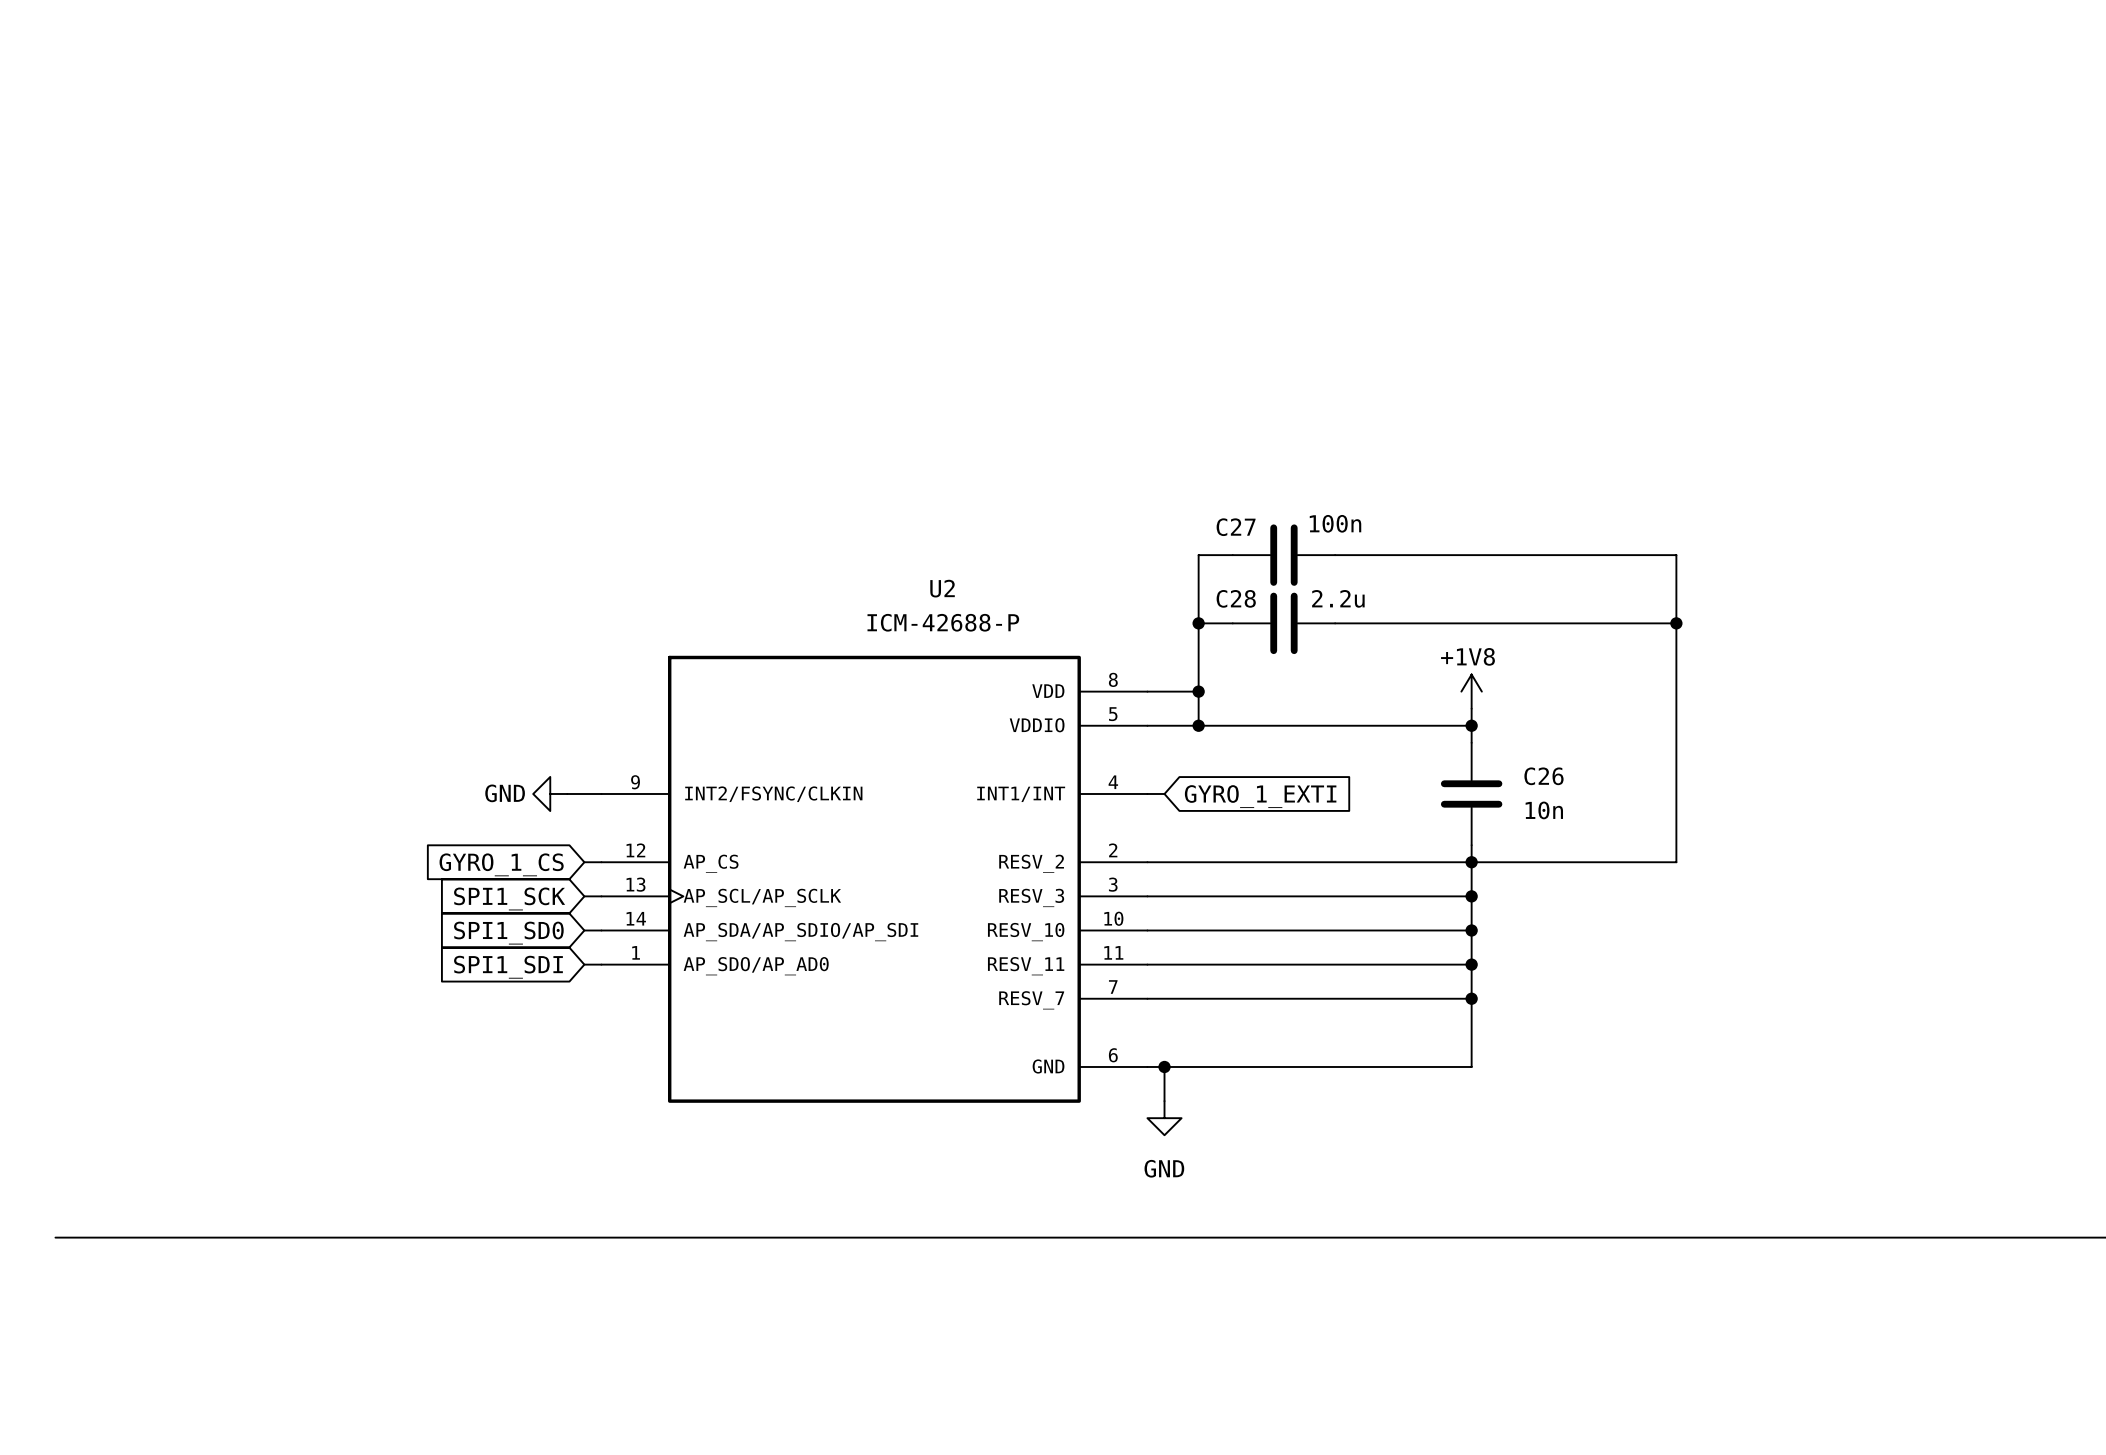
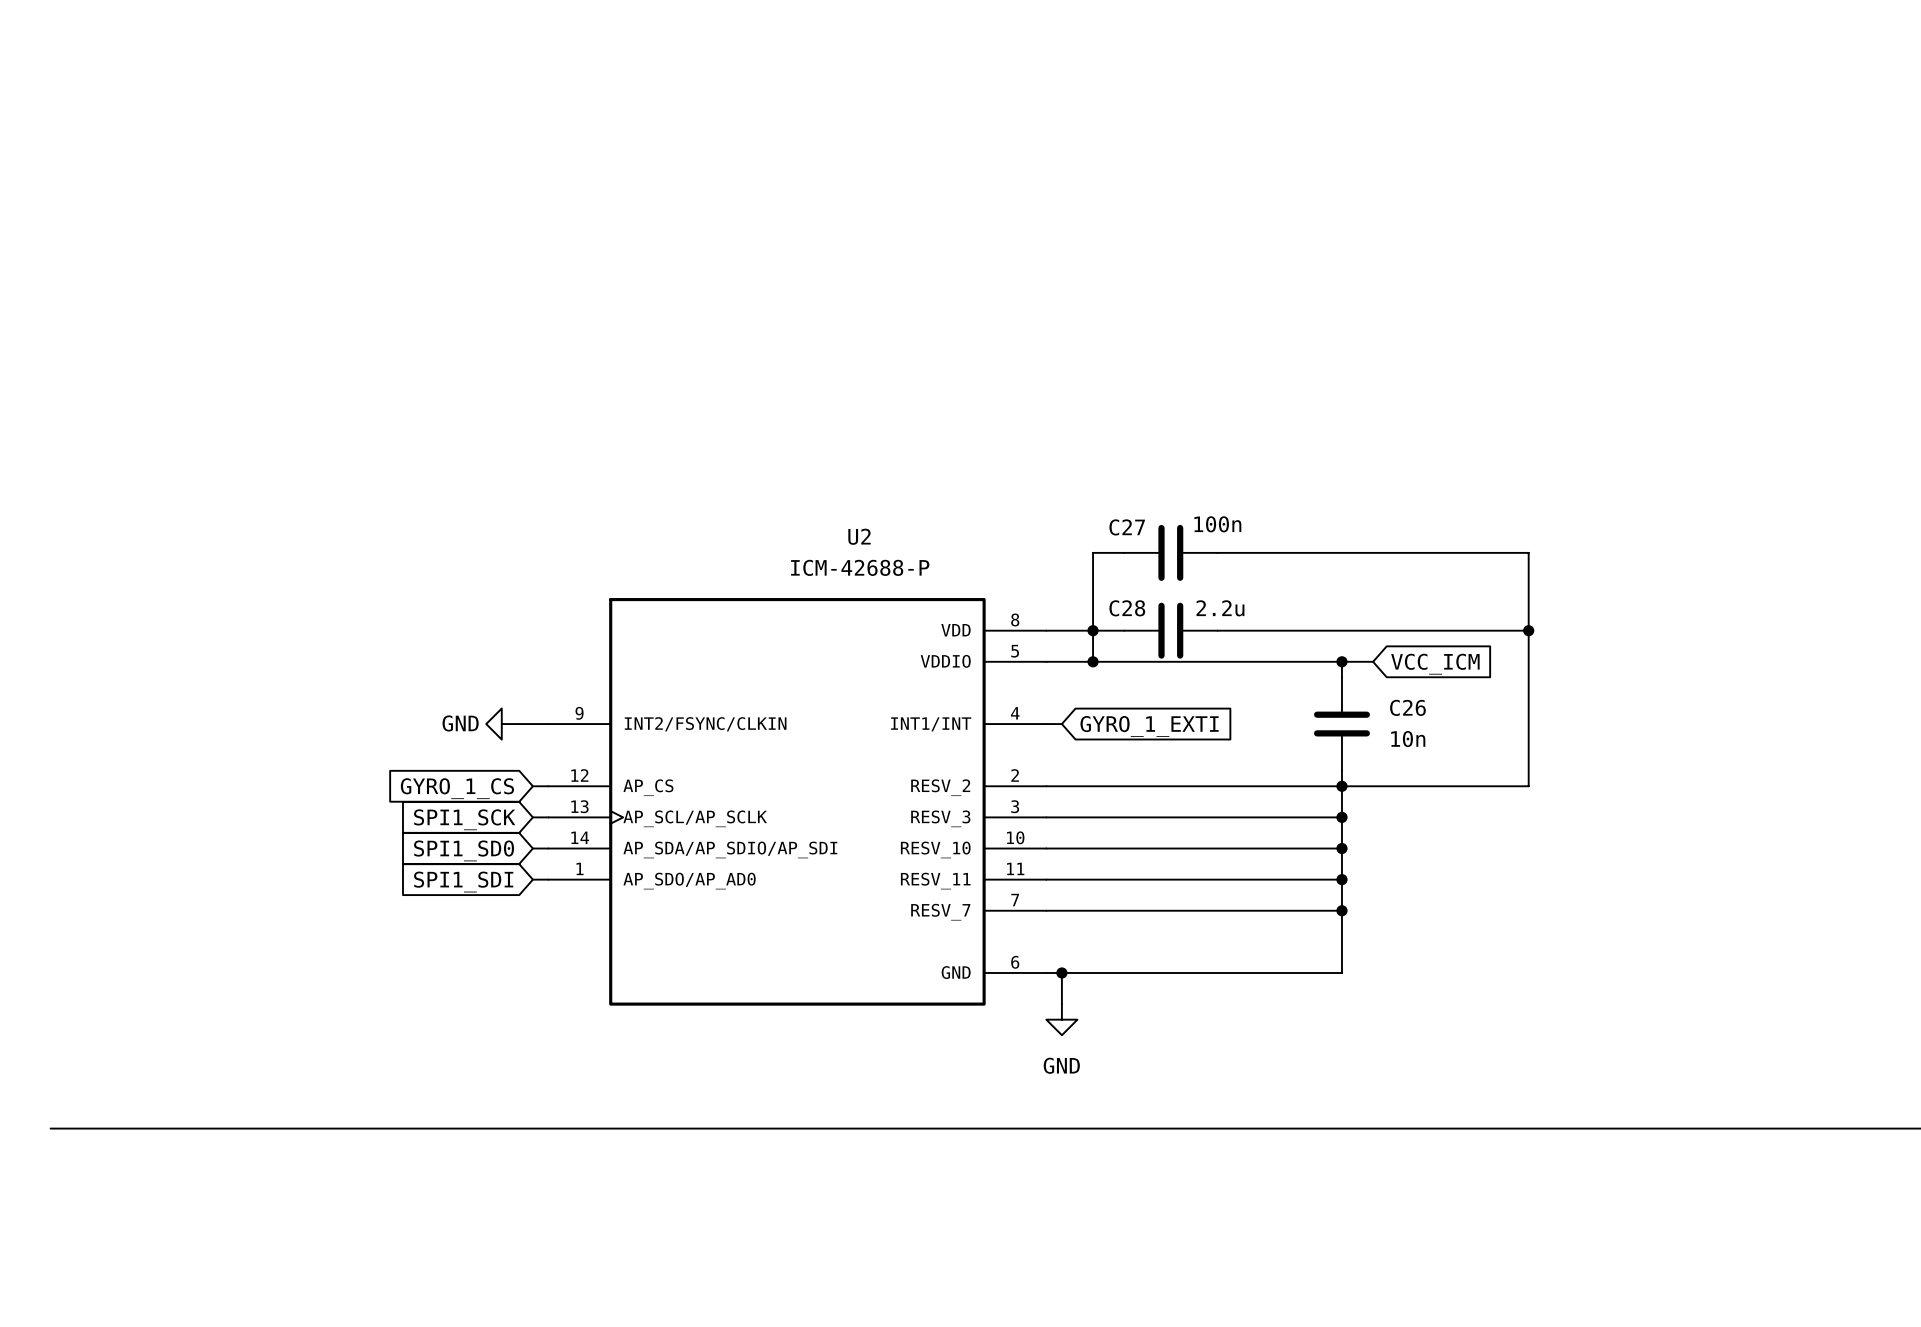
wire: (1232, 555) (1198, 555) (1198, 606) -> (1124, 552) (1093, 552)
C27 position: (1283, 555) -> (1170, 552)
wire: (1335, 555) (1676, 555) (1676, 606) -> (1217, 552) (1528, 552)
wire: (1198, 623) (1232, 623) -> (1093, 630) (1124, 630)
junction: (1198, 623) -> none
C28 position: (1283, 623) -> (1170, 630)
wire: (1335, 623) (1676, 623) -> (1217, 630) (1528, 630)
junction position: (1676, 623) -> (1528, 630)
power symbol: +1V8 (1471, 691) -> none
wire: (1471, 708) (1471, 725) -> (1373, 661) (1341, 661)
global label: none -> VCC_ICM (1435, 664)

